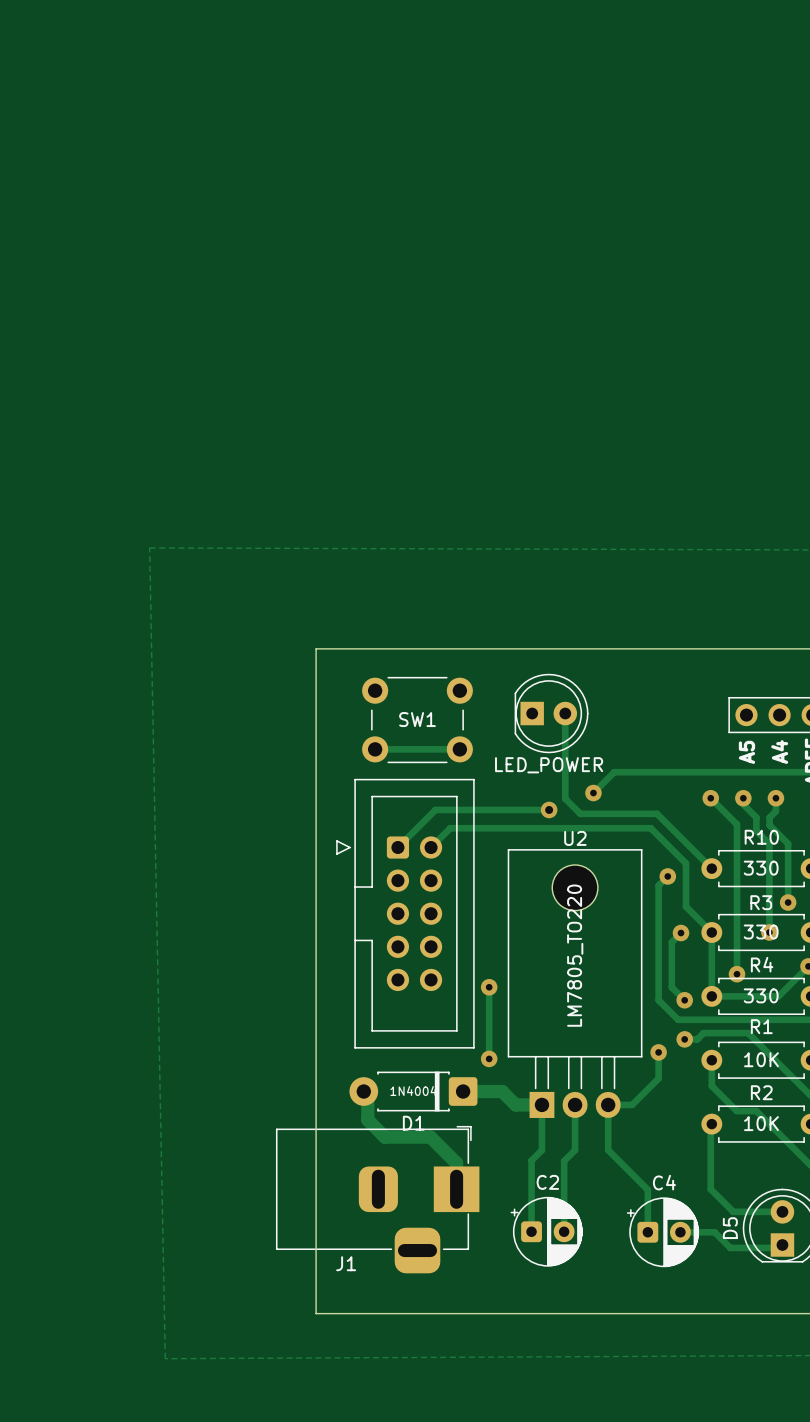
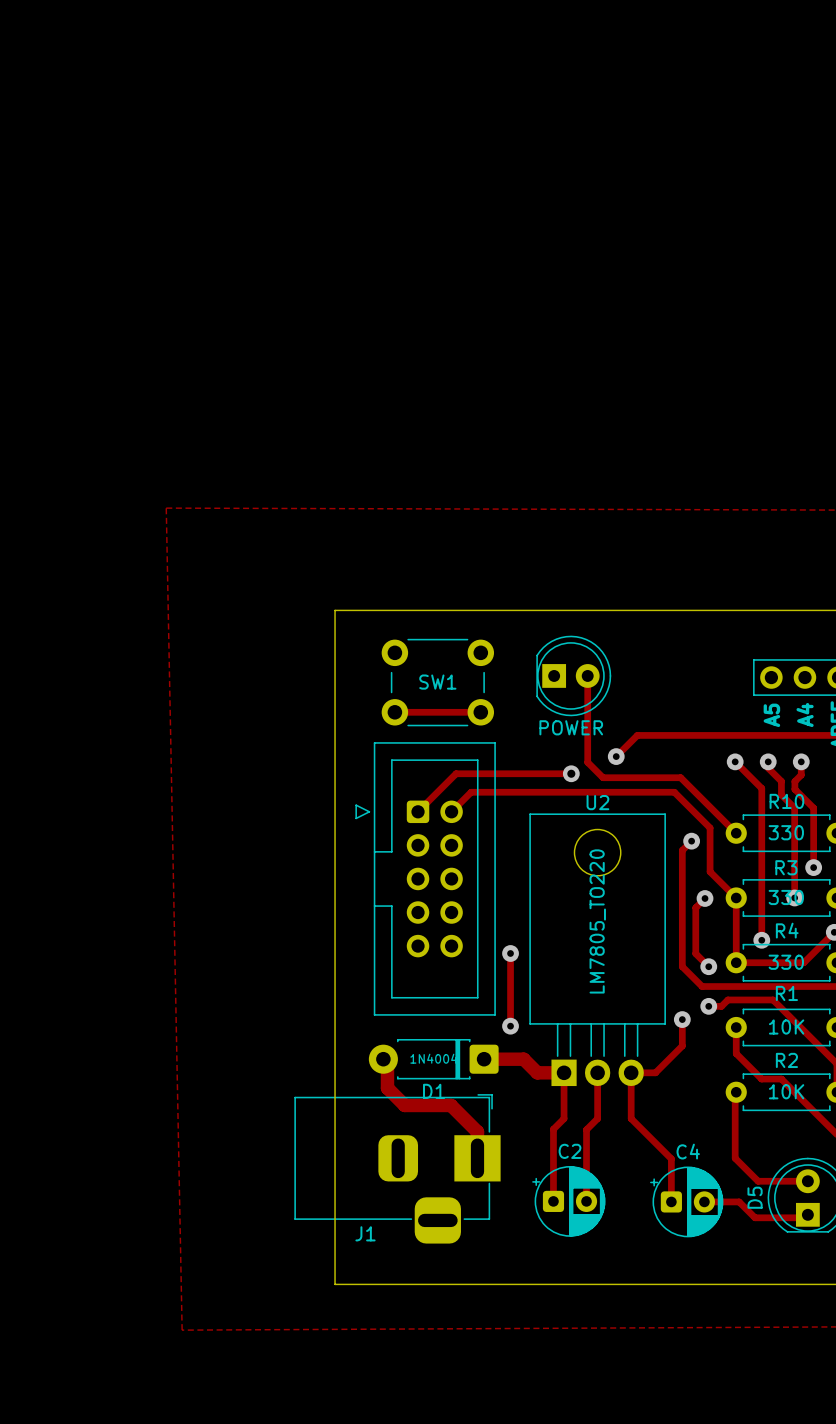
part value: LED_POWER (549, 765) -> POWER (571, 727)

